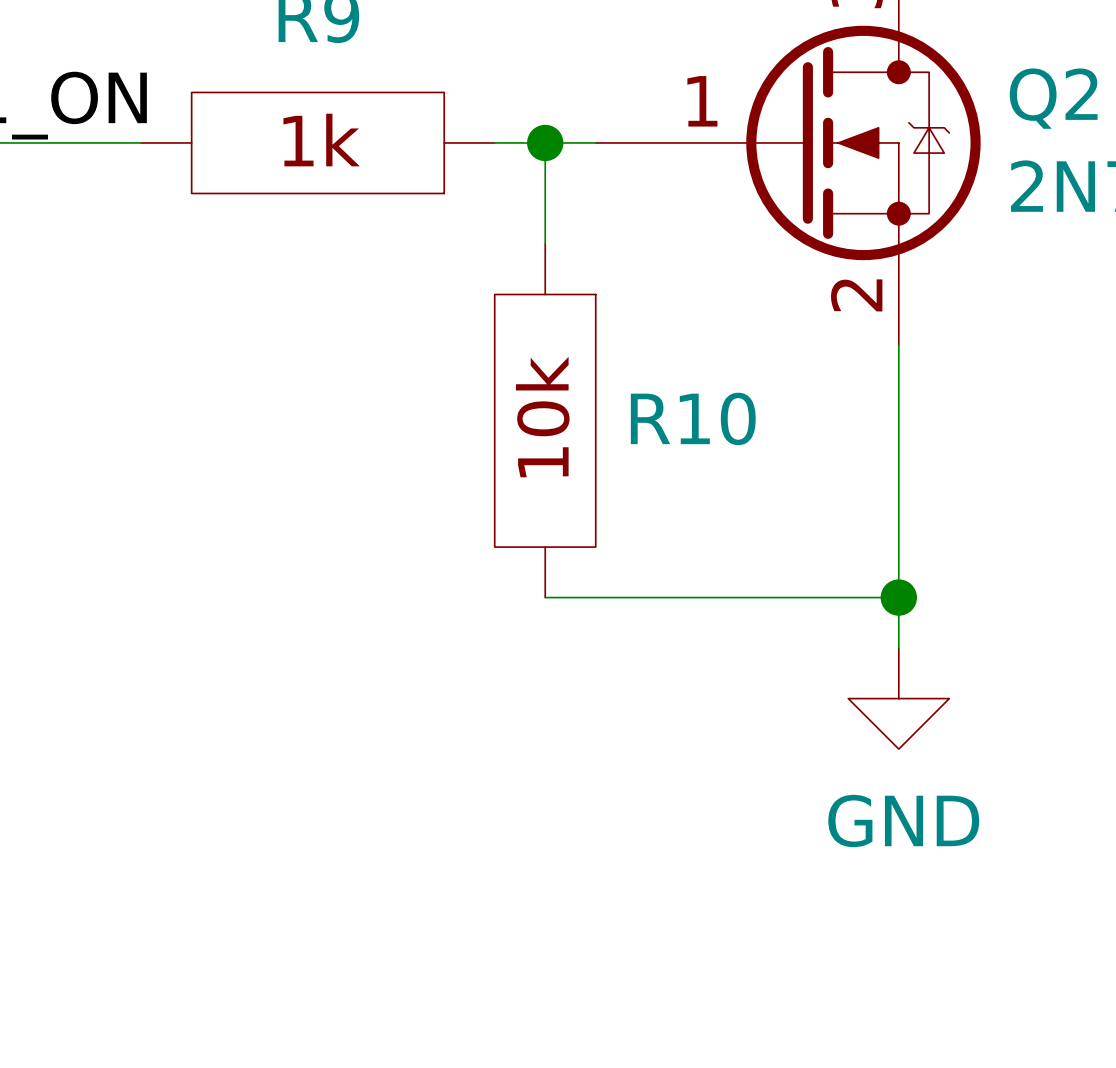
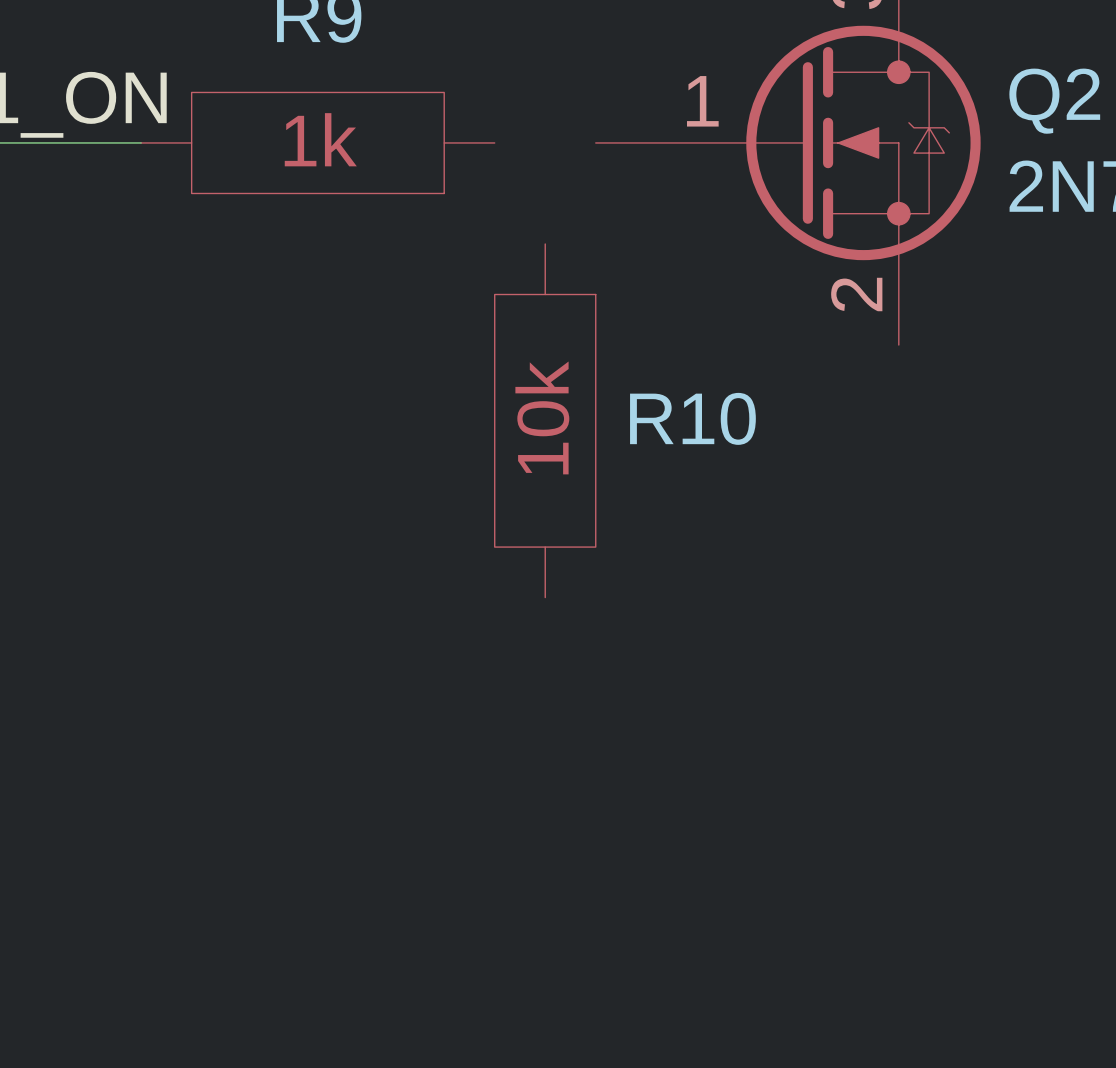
wire: (494, 142) (595, 142) -> none
wire: (545, 142) (545, 243) -> none
junction: (545, 142) -> none
wire: (898, 345) (898, 648) -> none
wire: (545, 597) (898, 597) -> none
junction: (898, 597) -> none
power symbol: GND (898, 698) -> none

